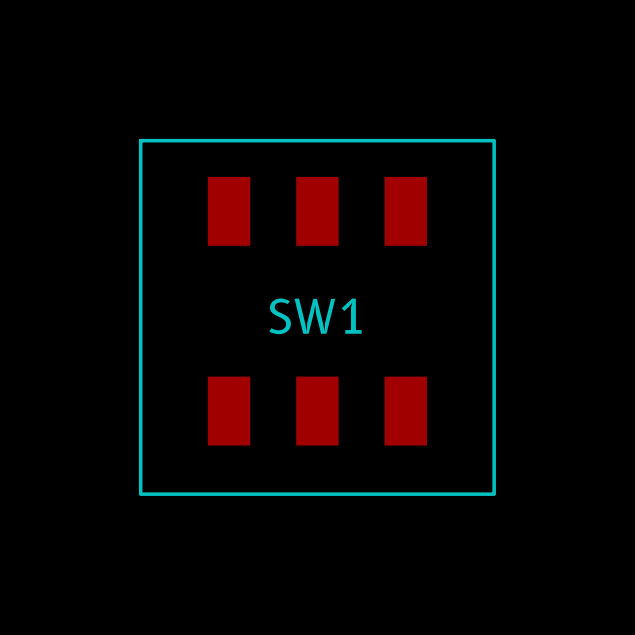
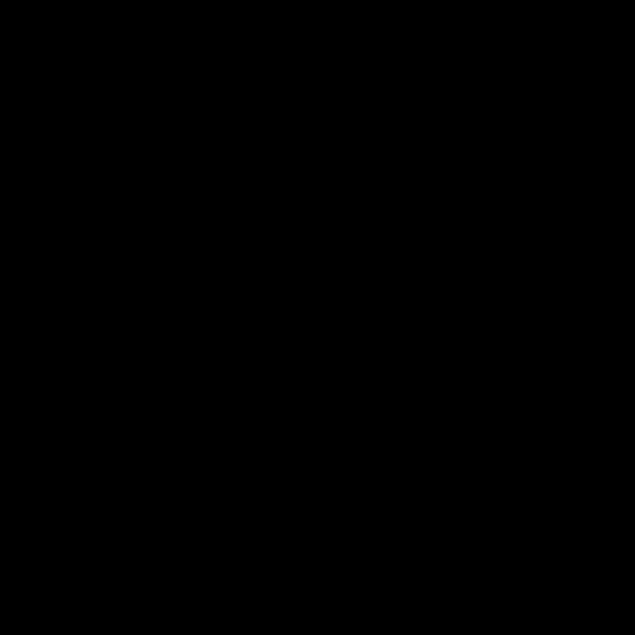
SW1: (317, 317) -> none

